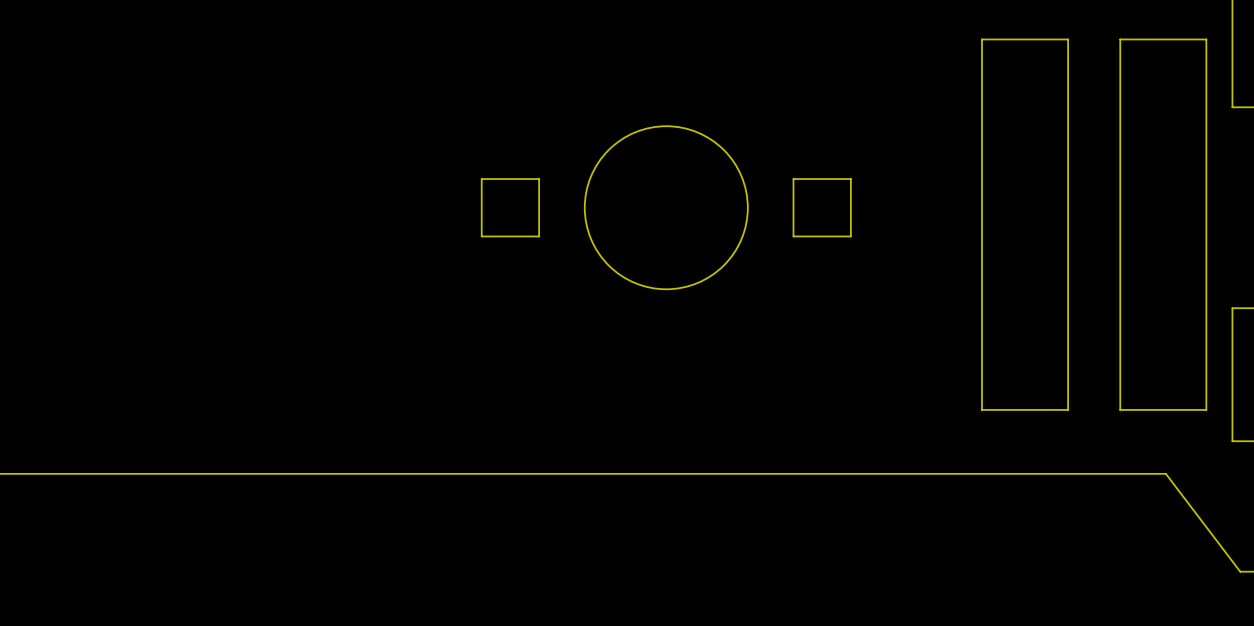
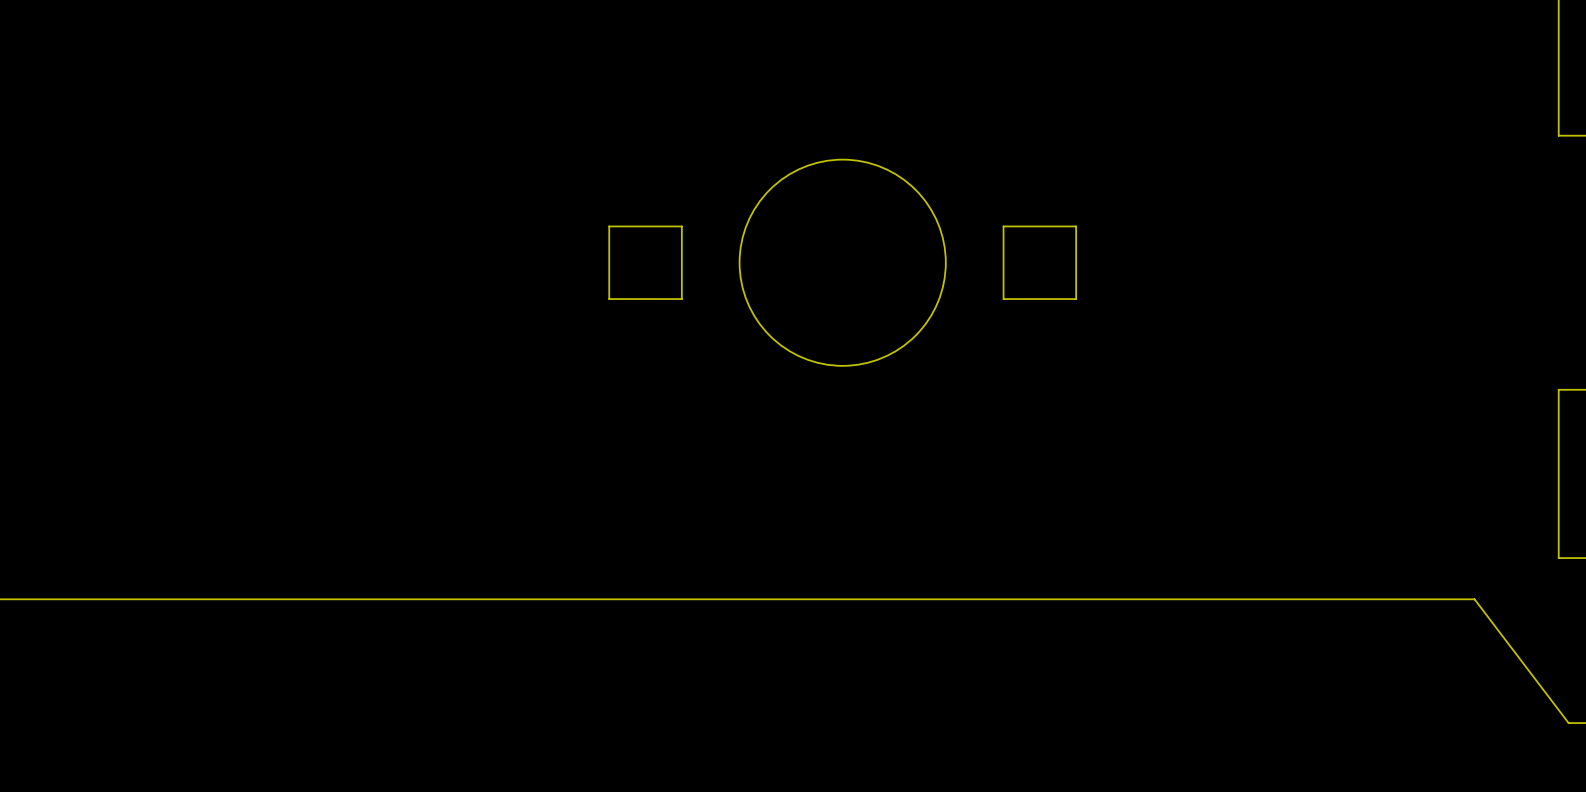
board edge: (981, 39) (981, 409) (1068, 409) (1068, 39) (981, 39) -> none
board edge: (1120, 39) (1206, 39) (1206, 409) (1120, 409) (1120, 39) -> none

